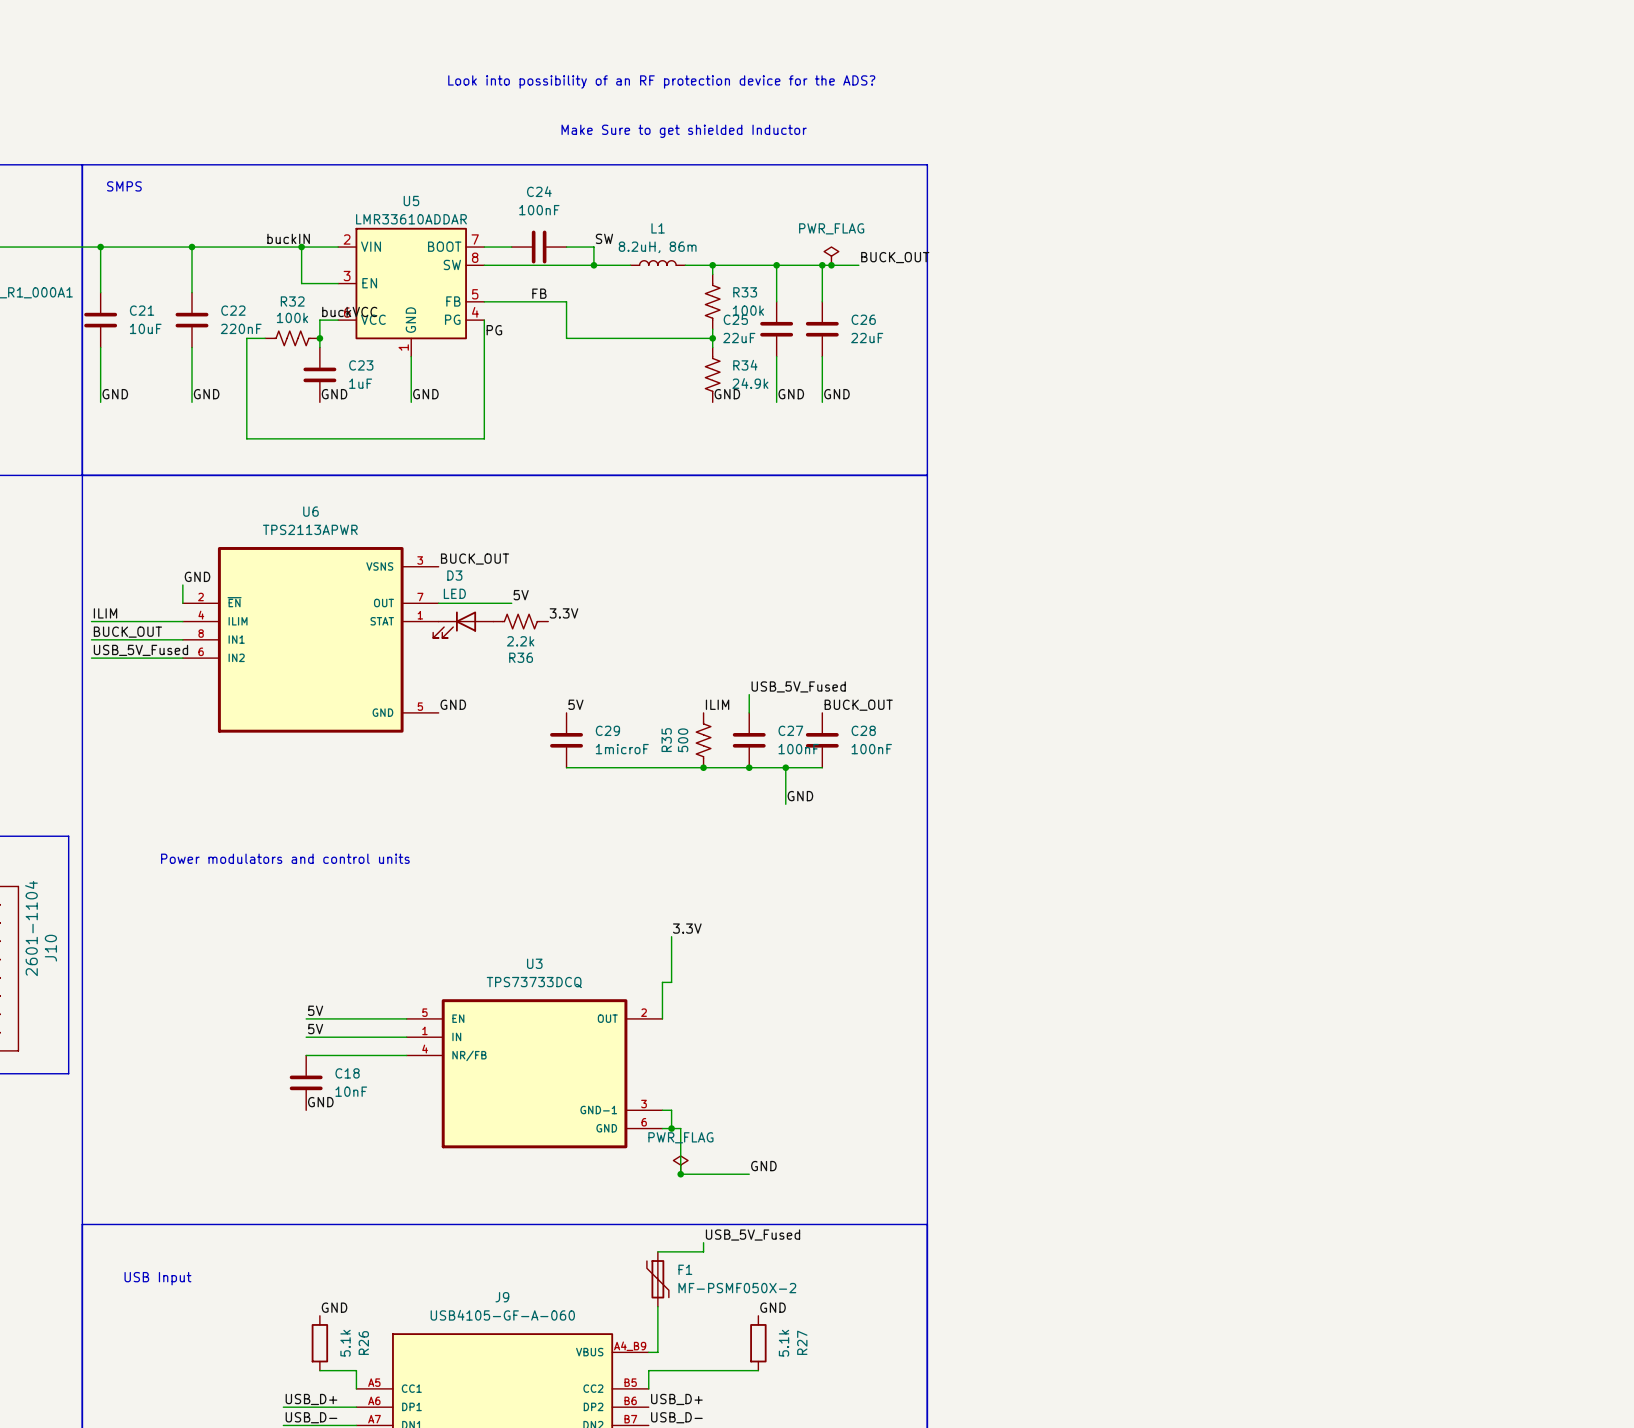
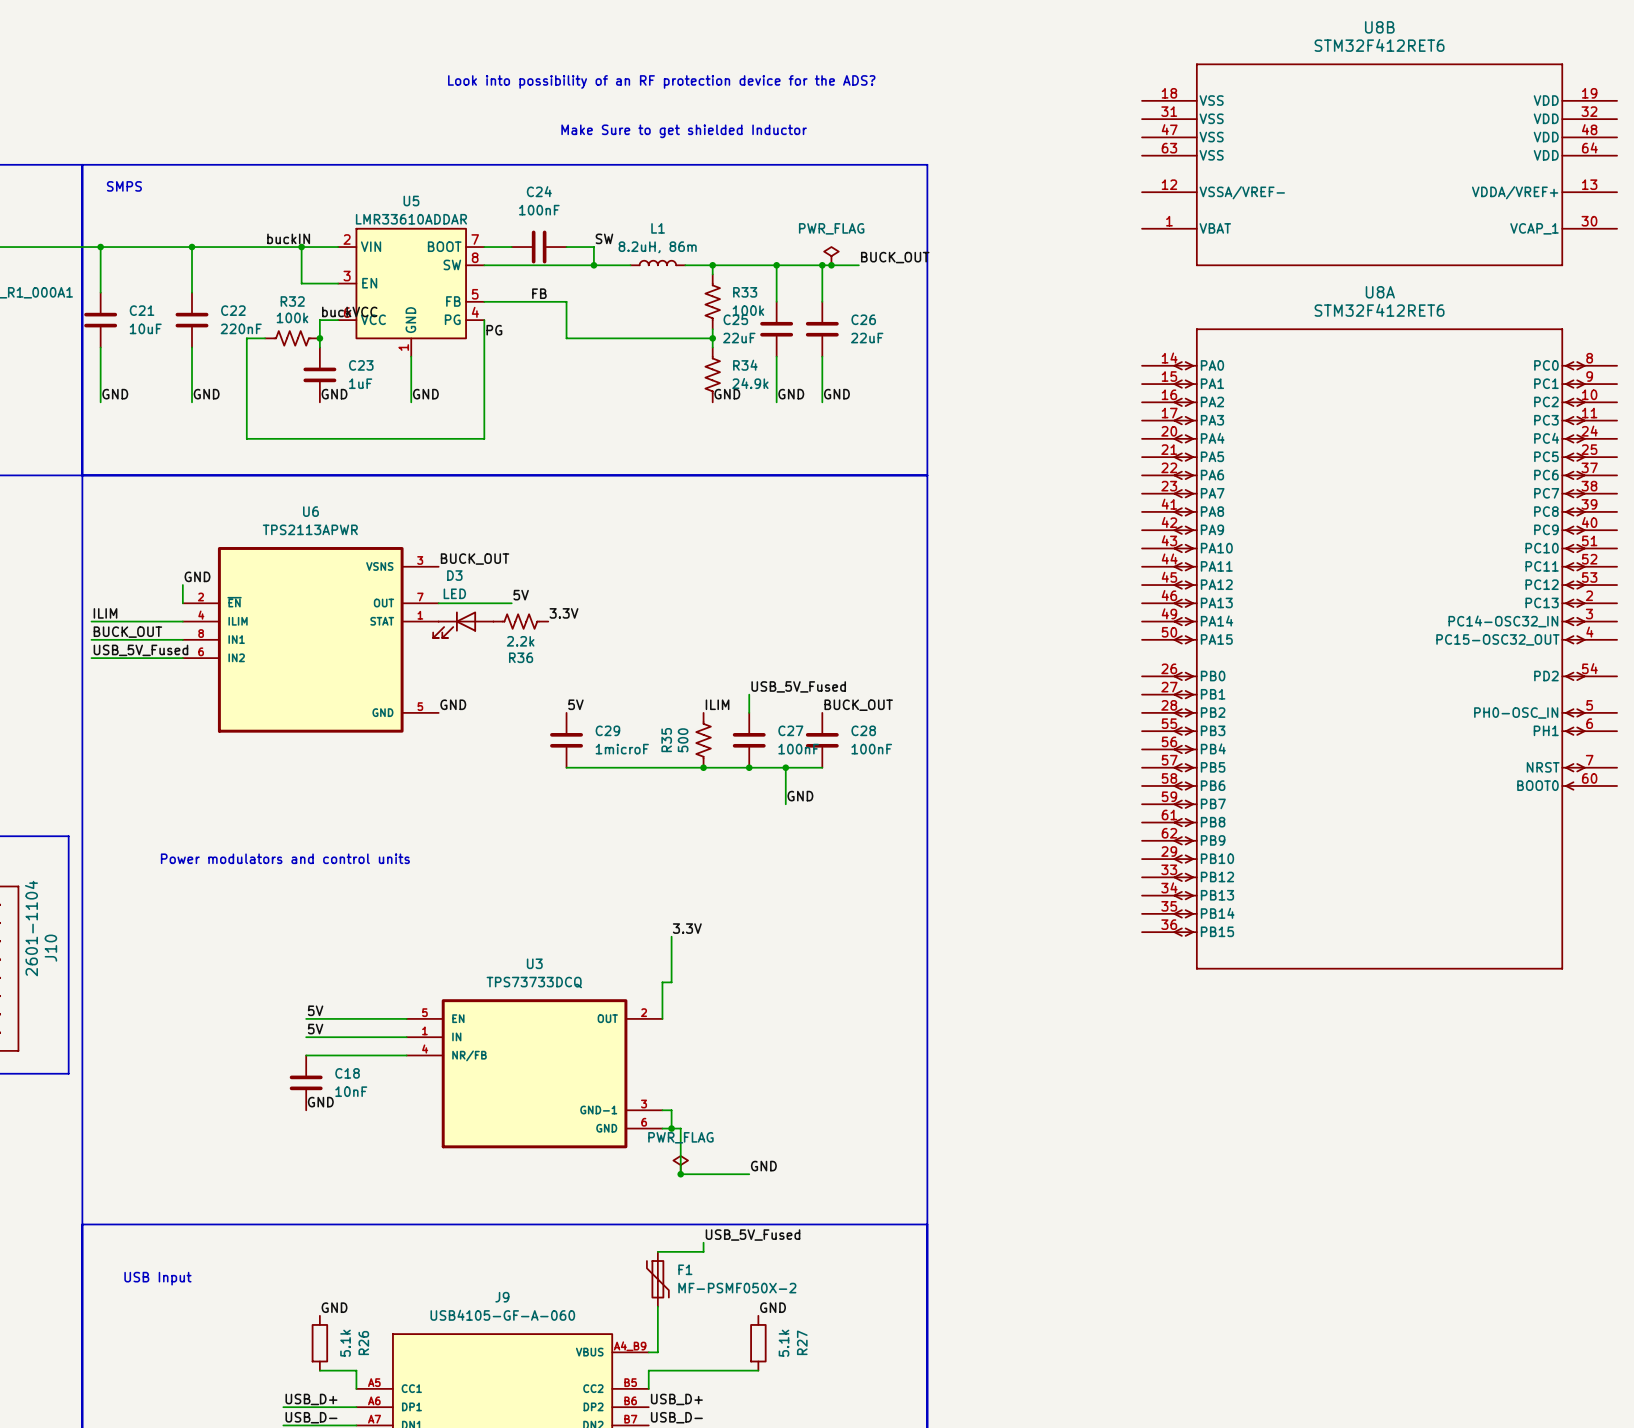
U8B: none -> STM32F412RET6 (1379, 164)
U8A: none -> STM32F412RET6 (1379, 648)

